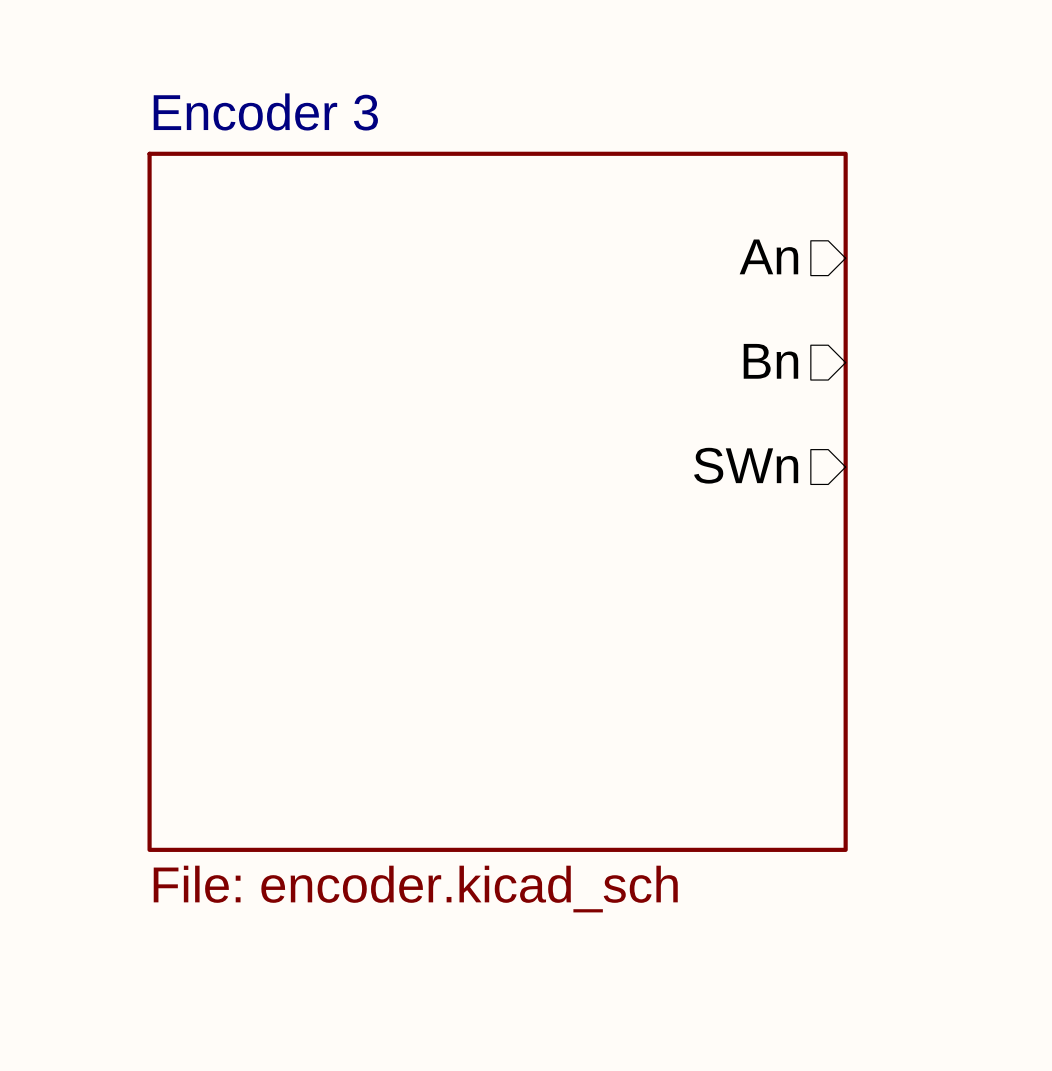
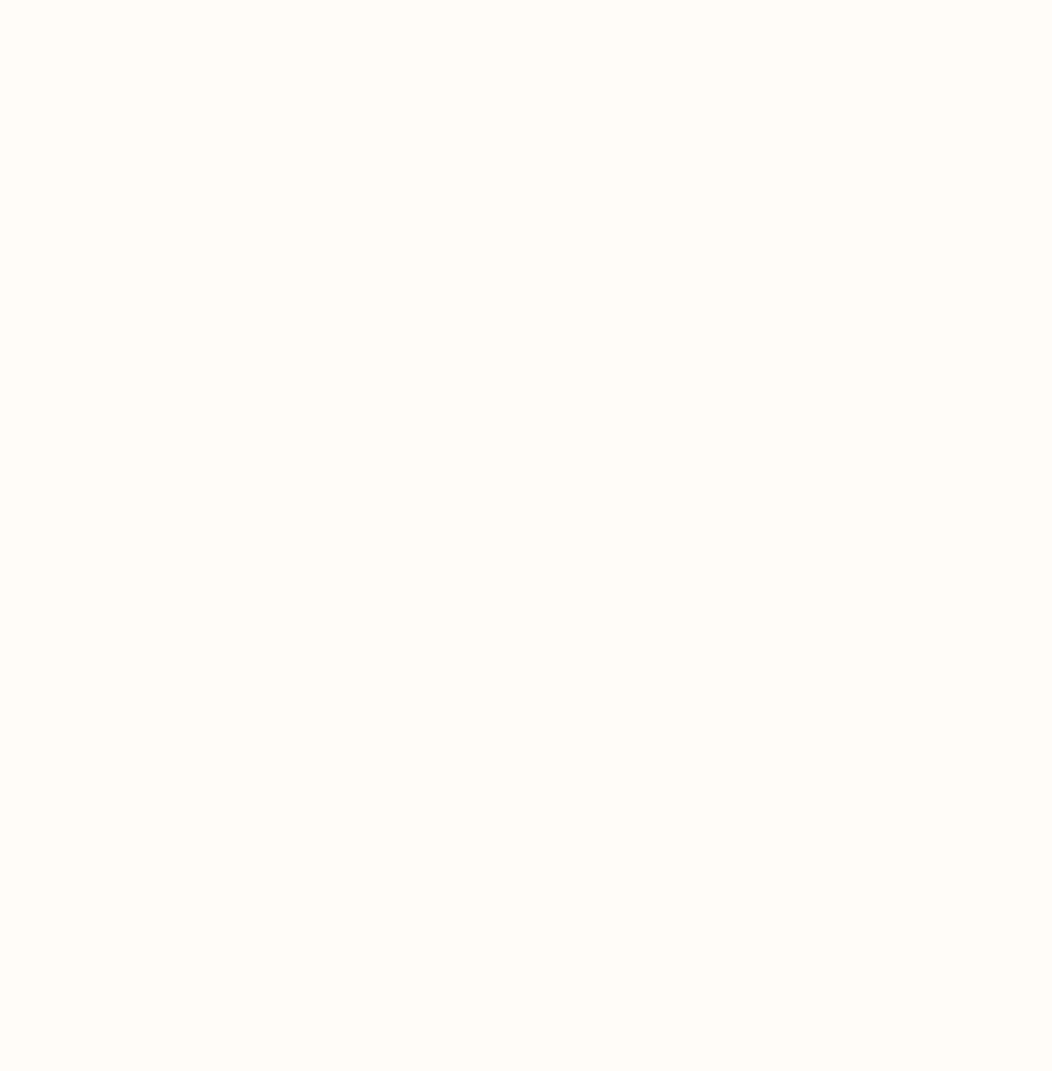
sheet pin: An (768, 256) -> none
sheet pin: Bn (770, 361) -> none
sheet pin: SWn (746, 465) -> none
sheet Encoder 3: File: encoder.kicad_sch (497, 501) -> none

